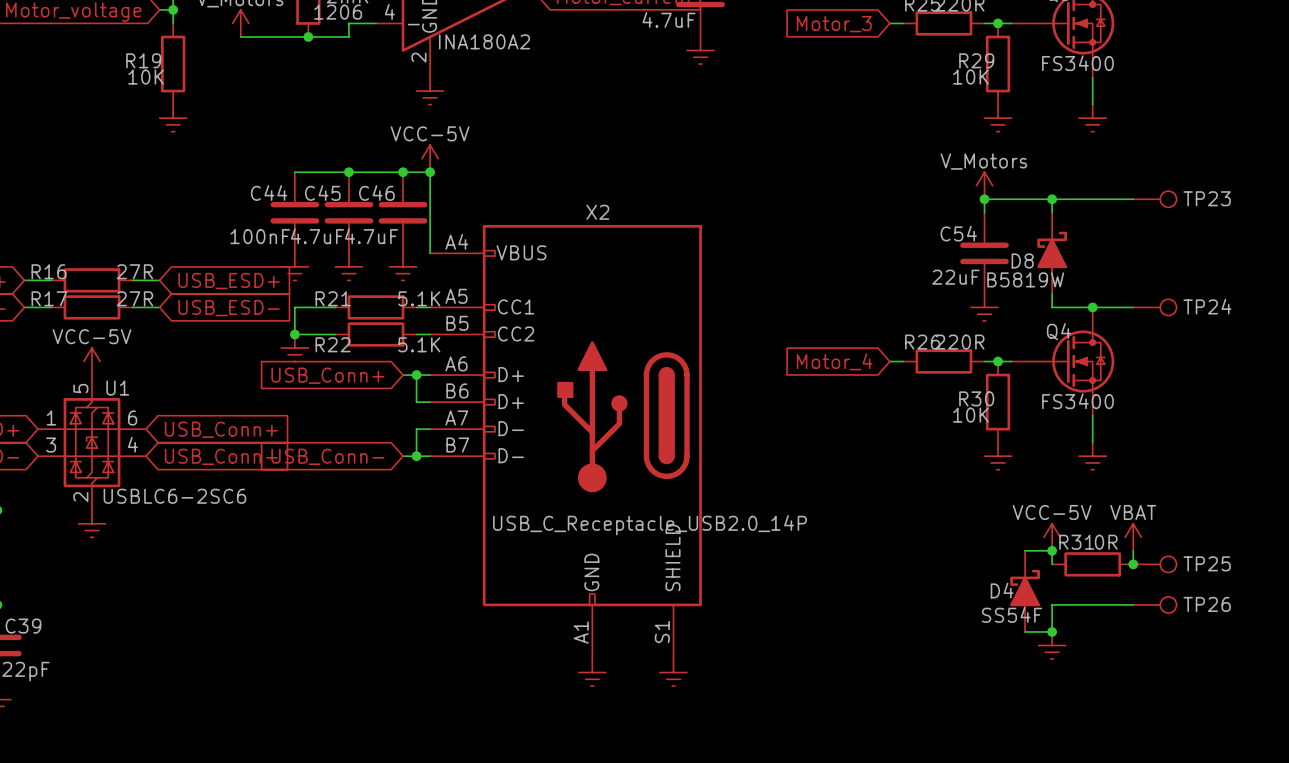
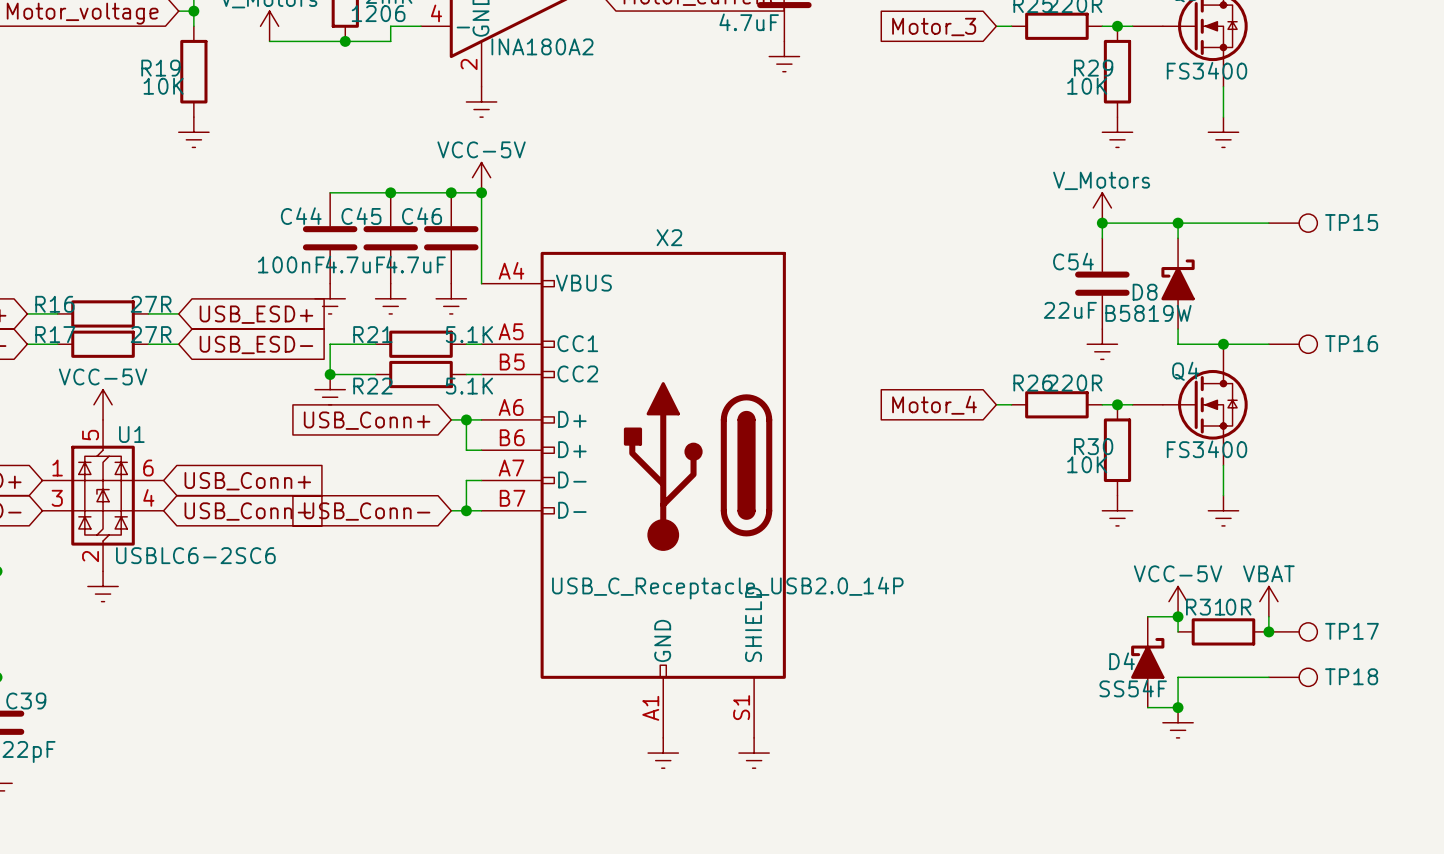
TP23 name: TP23 (1207, 198) -> TP15 (1351, 222)
TP24 name: TP24 (1207, 306) -> TP16 (1351, 343)
TP25 name: TP25 (1207, 563) -> TP17 (1351, 631)
TP26 name: TP26 (1207, 604) -> TP18 (1351, 676)

